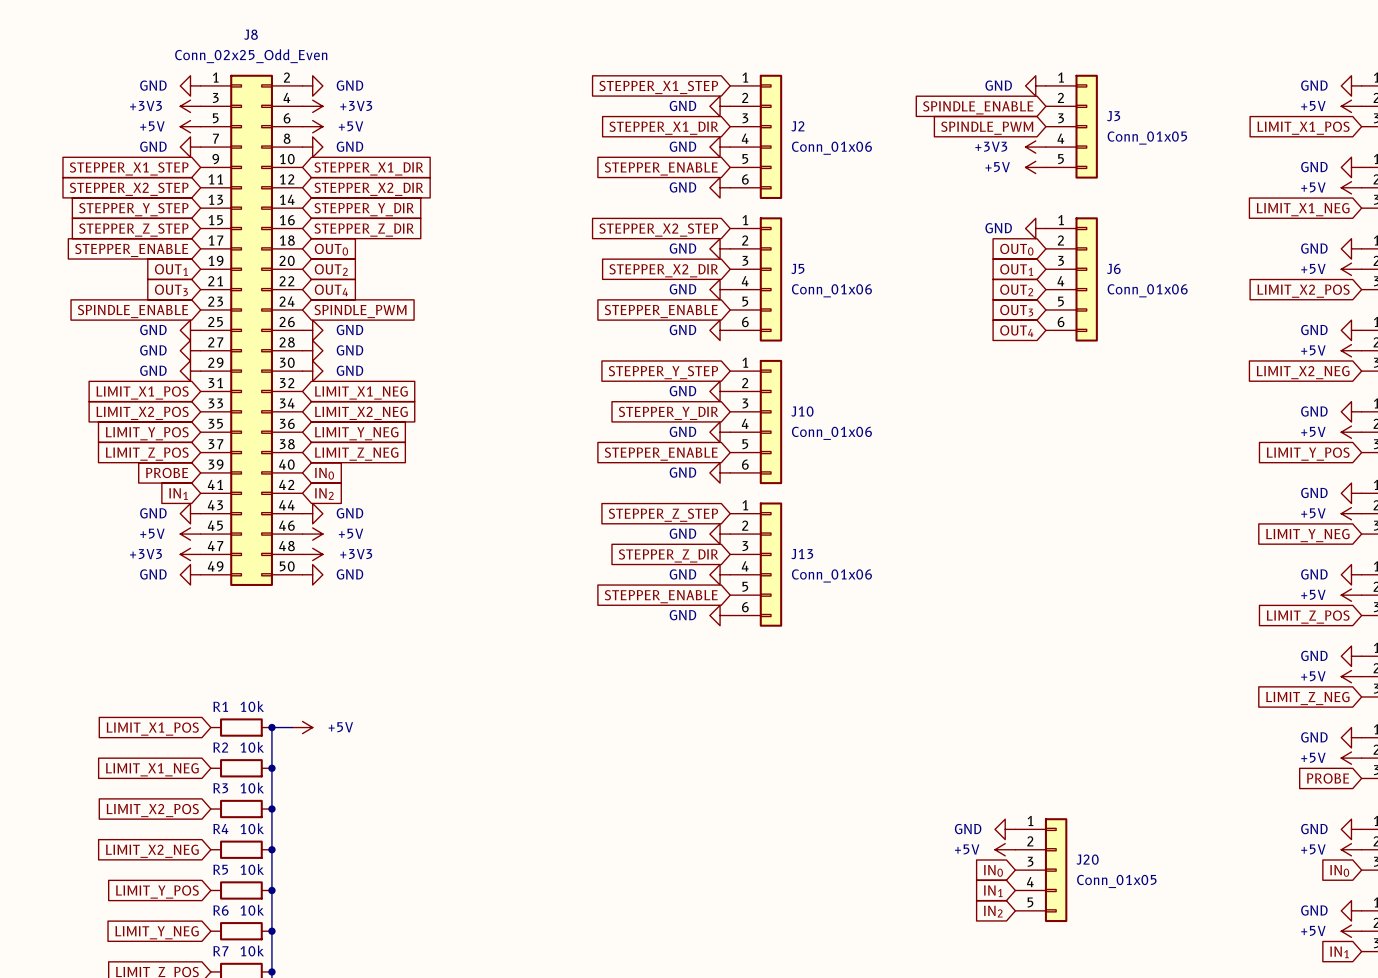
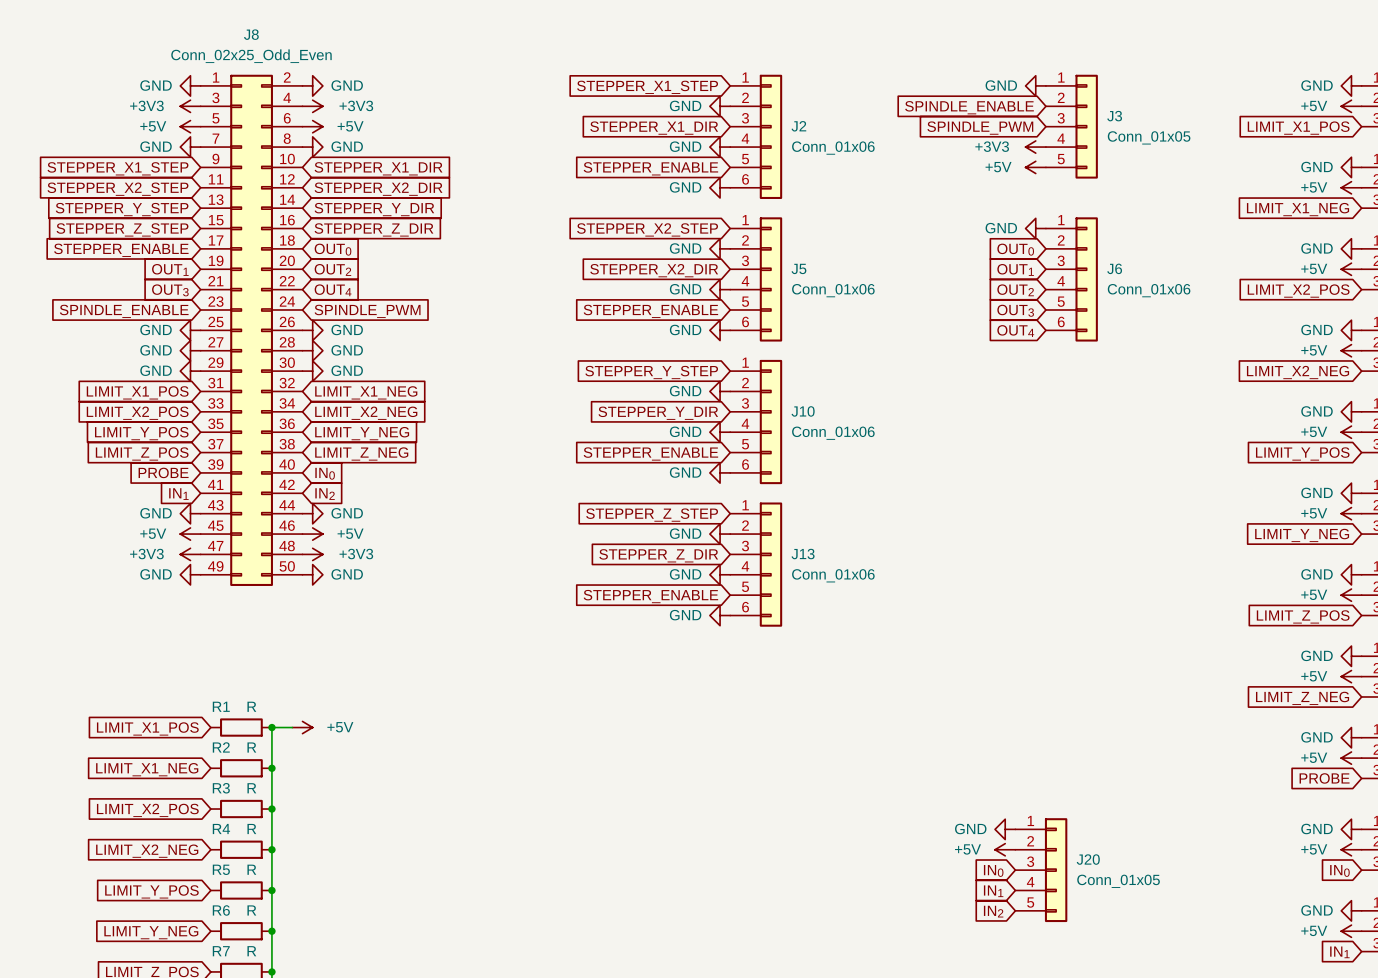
R1 value: 10k (252, 706) -> R (251, 706)
R2 value: 10k (252, 747) -> R (251, 747)
R3 value: 10k (252, 787) -> R (251, 788)
R4 value: 10k (252, 828) -> R (251, 829)
R5 value: 10k (252, 869) -> R (251, 869)
R6 value: 10k (252, 910) -> R (251, 910)
R7 value: 10k (252, 950) -> R (251, 951)

